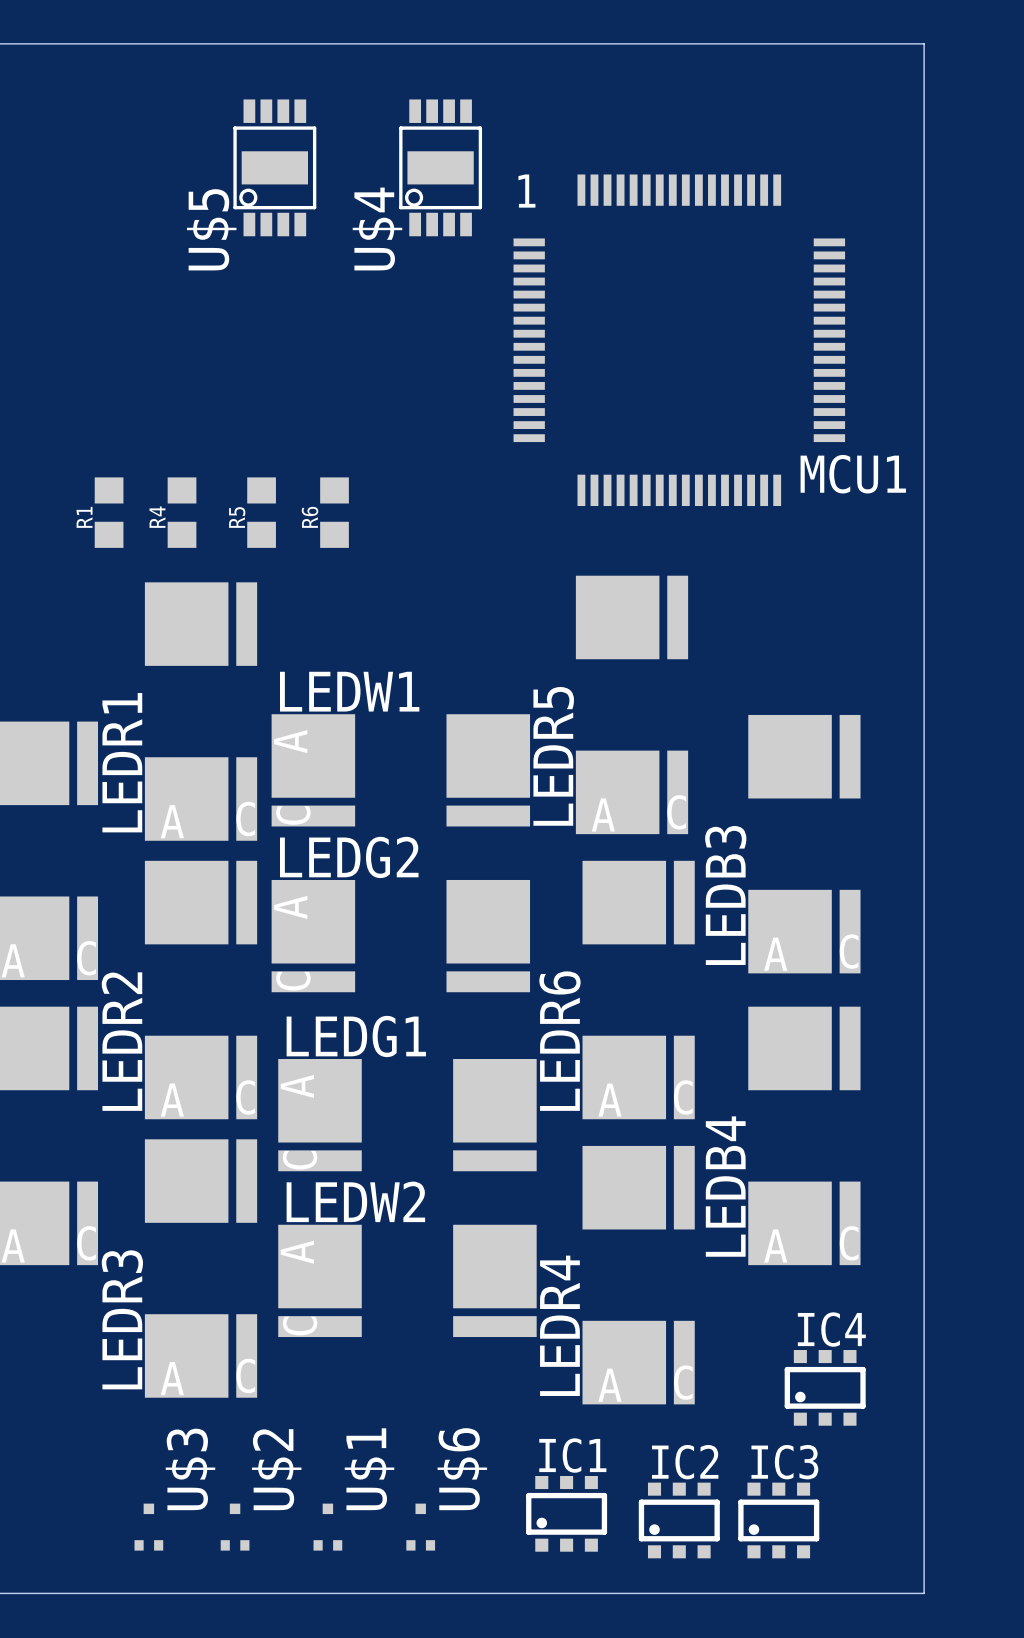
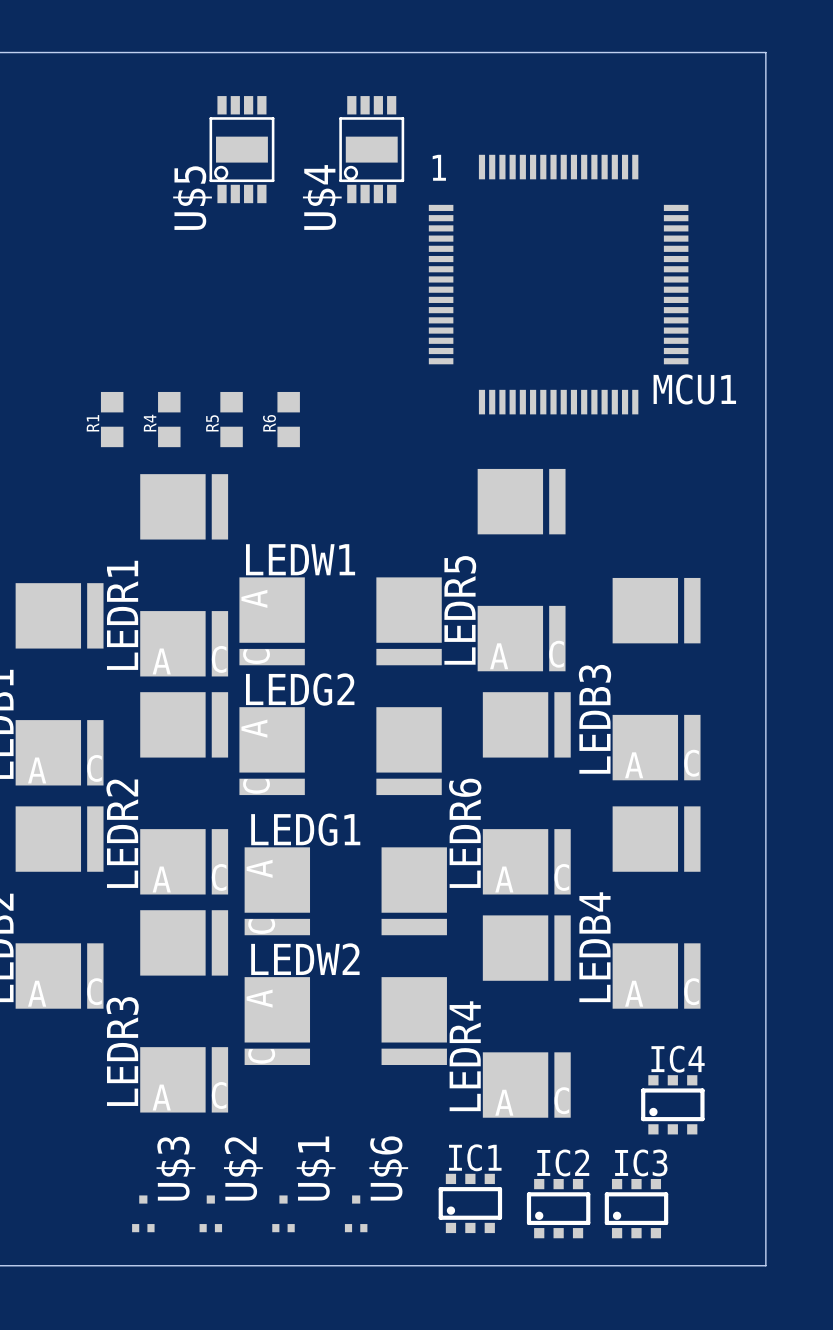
board edge: (924, 43) (924, 1593) -> (750, 52) (765, 52) (765, 1265) (750, 1265)

